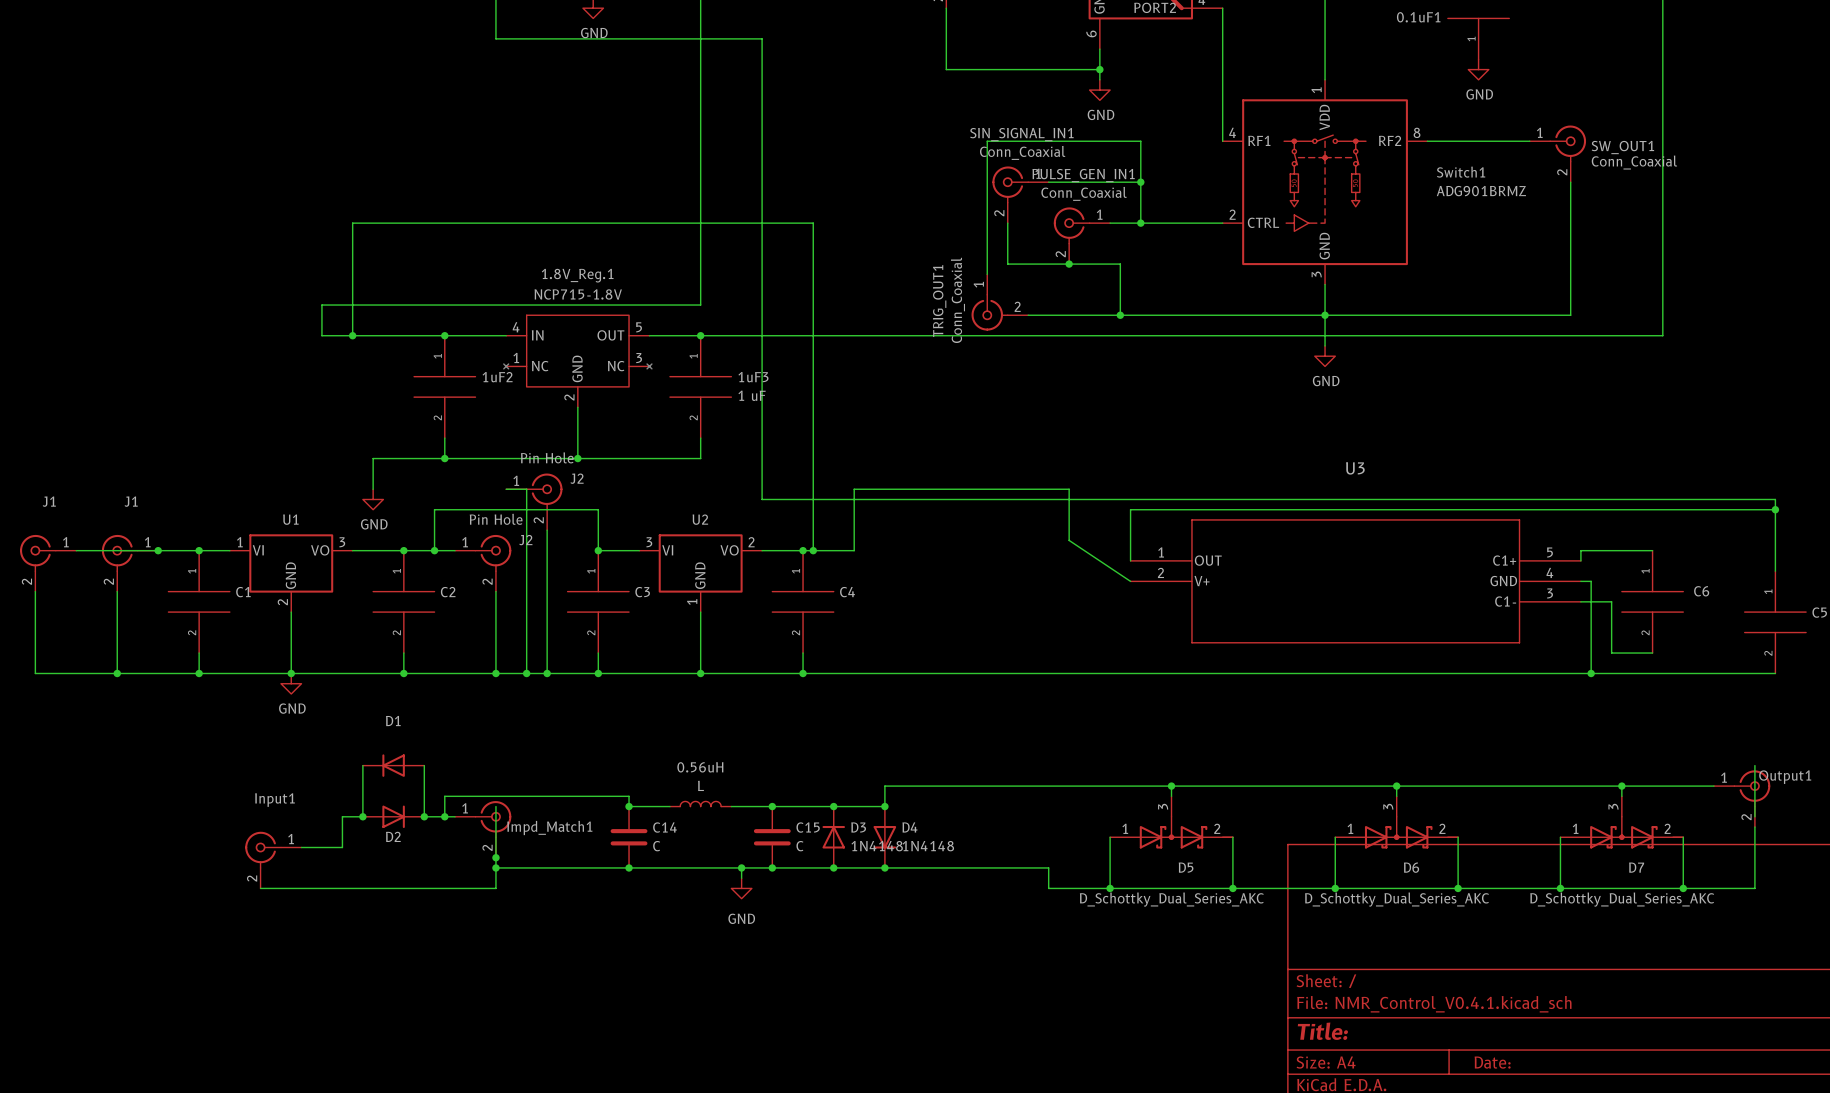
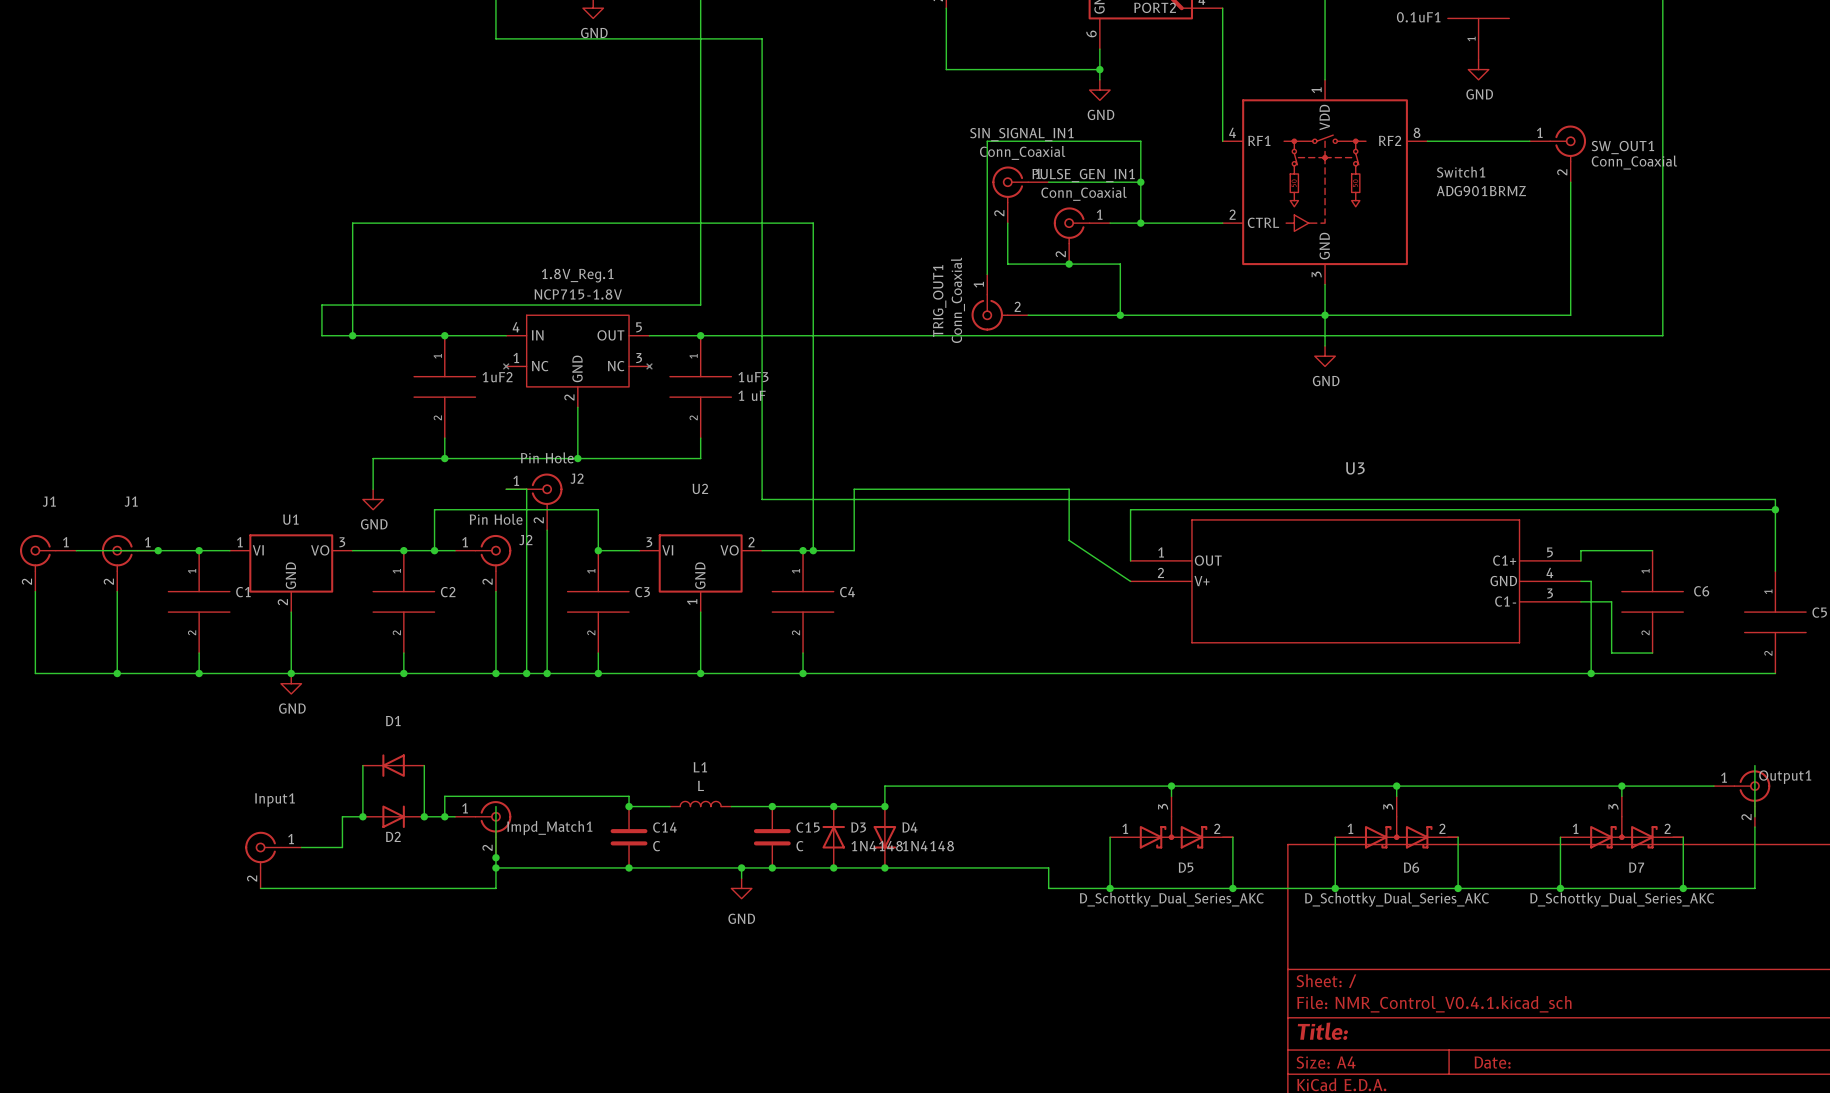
U2 name position: U2 (700, 519) -> U2 (700, 488)
0.56uH name: 0.56uH (700, 767) -> L1 (700, 767)

